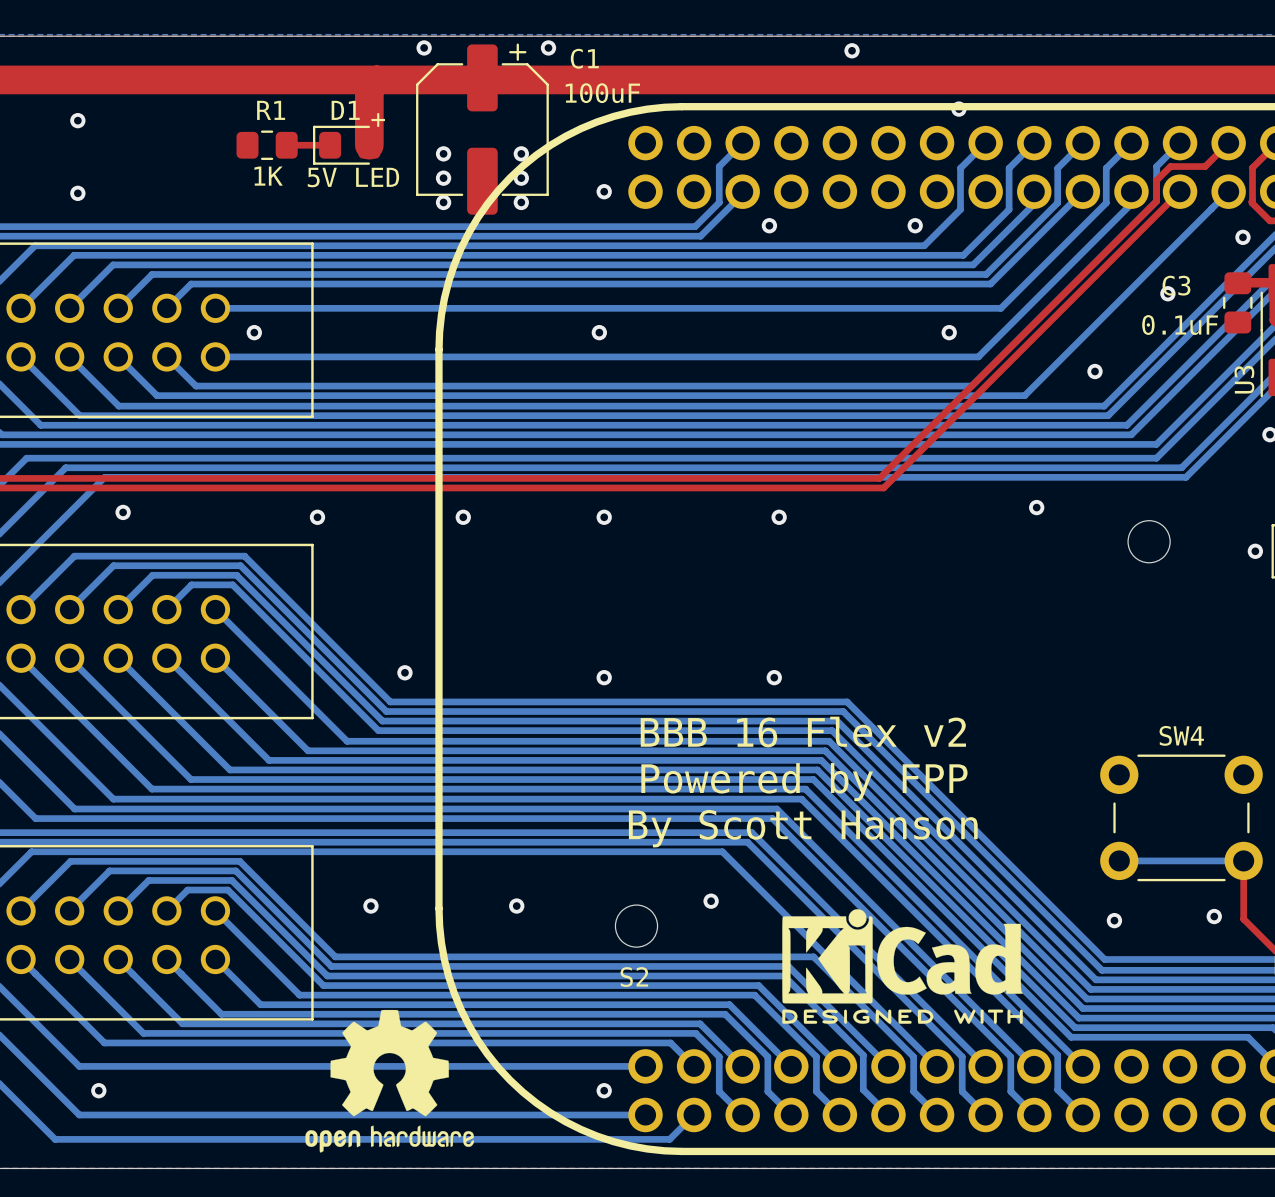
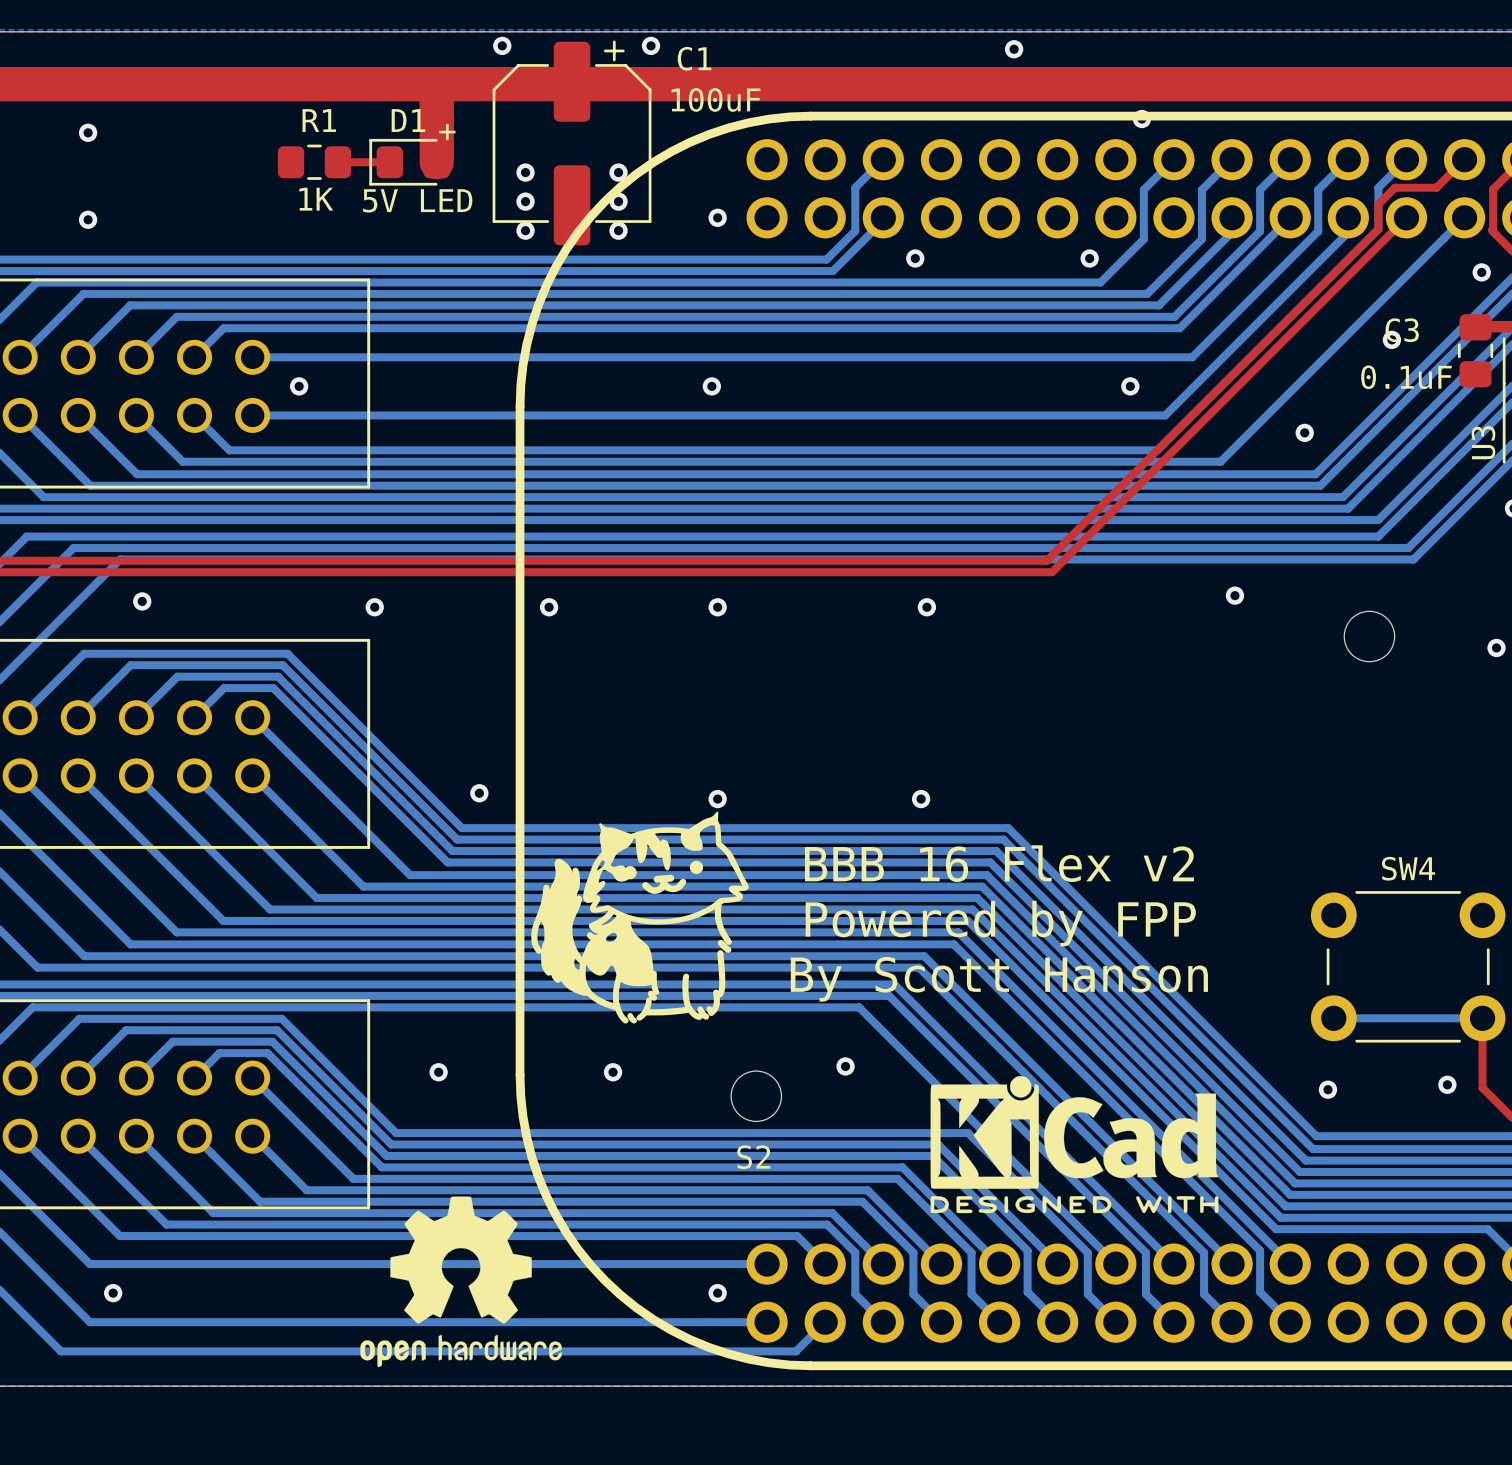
drawing: none -> [531, 811, 749, 1024]
text position: BBB 16 Flex v2 (803, 731) -> BBB 16 Flex v2 (999, 863)
text position: Powered by FPP (804, 782) -> Powered by FPP (1000, 923)
text position: By Scott Hanson (803, 828) -> By Scott Hanson (999, 979)

